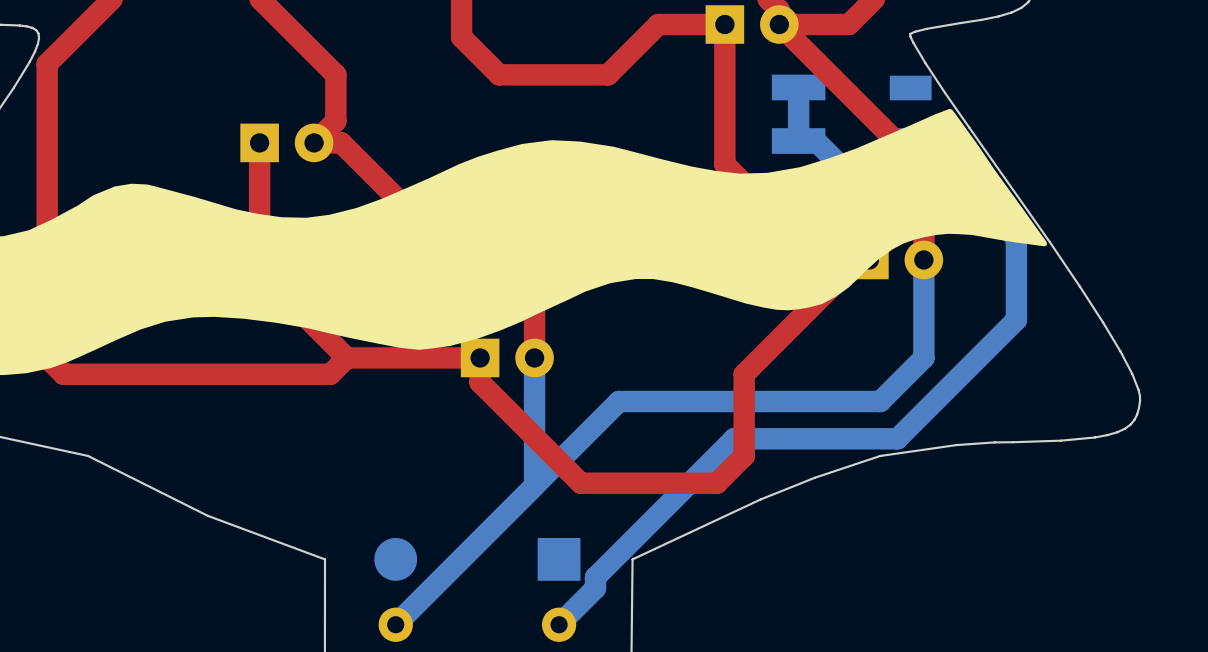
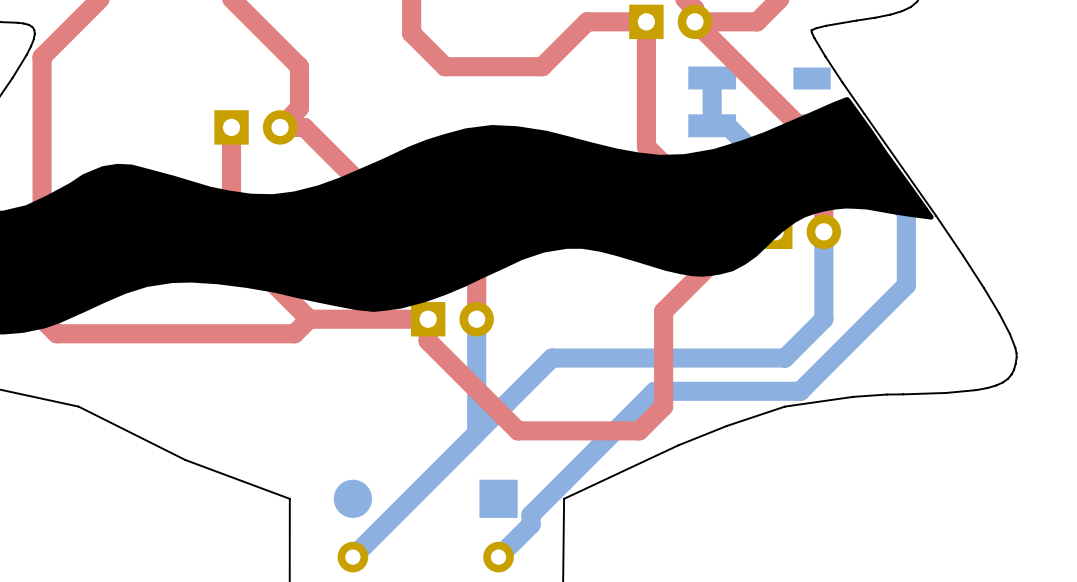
top track: (858, 259) (744, 374) -> (743, 231) (663, 311) (663, 333)

